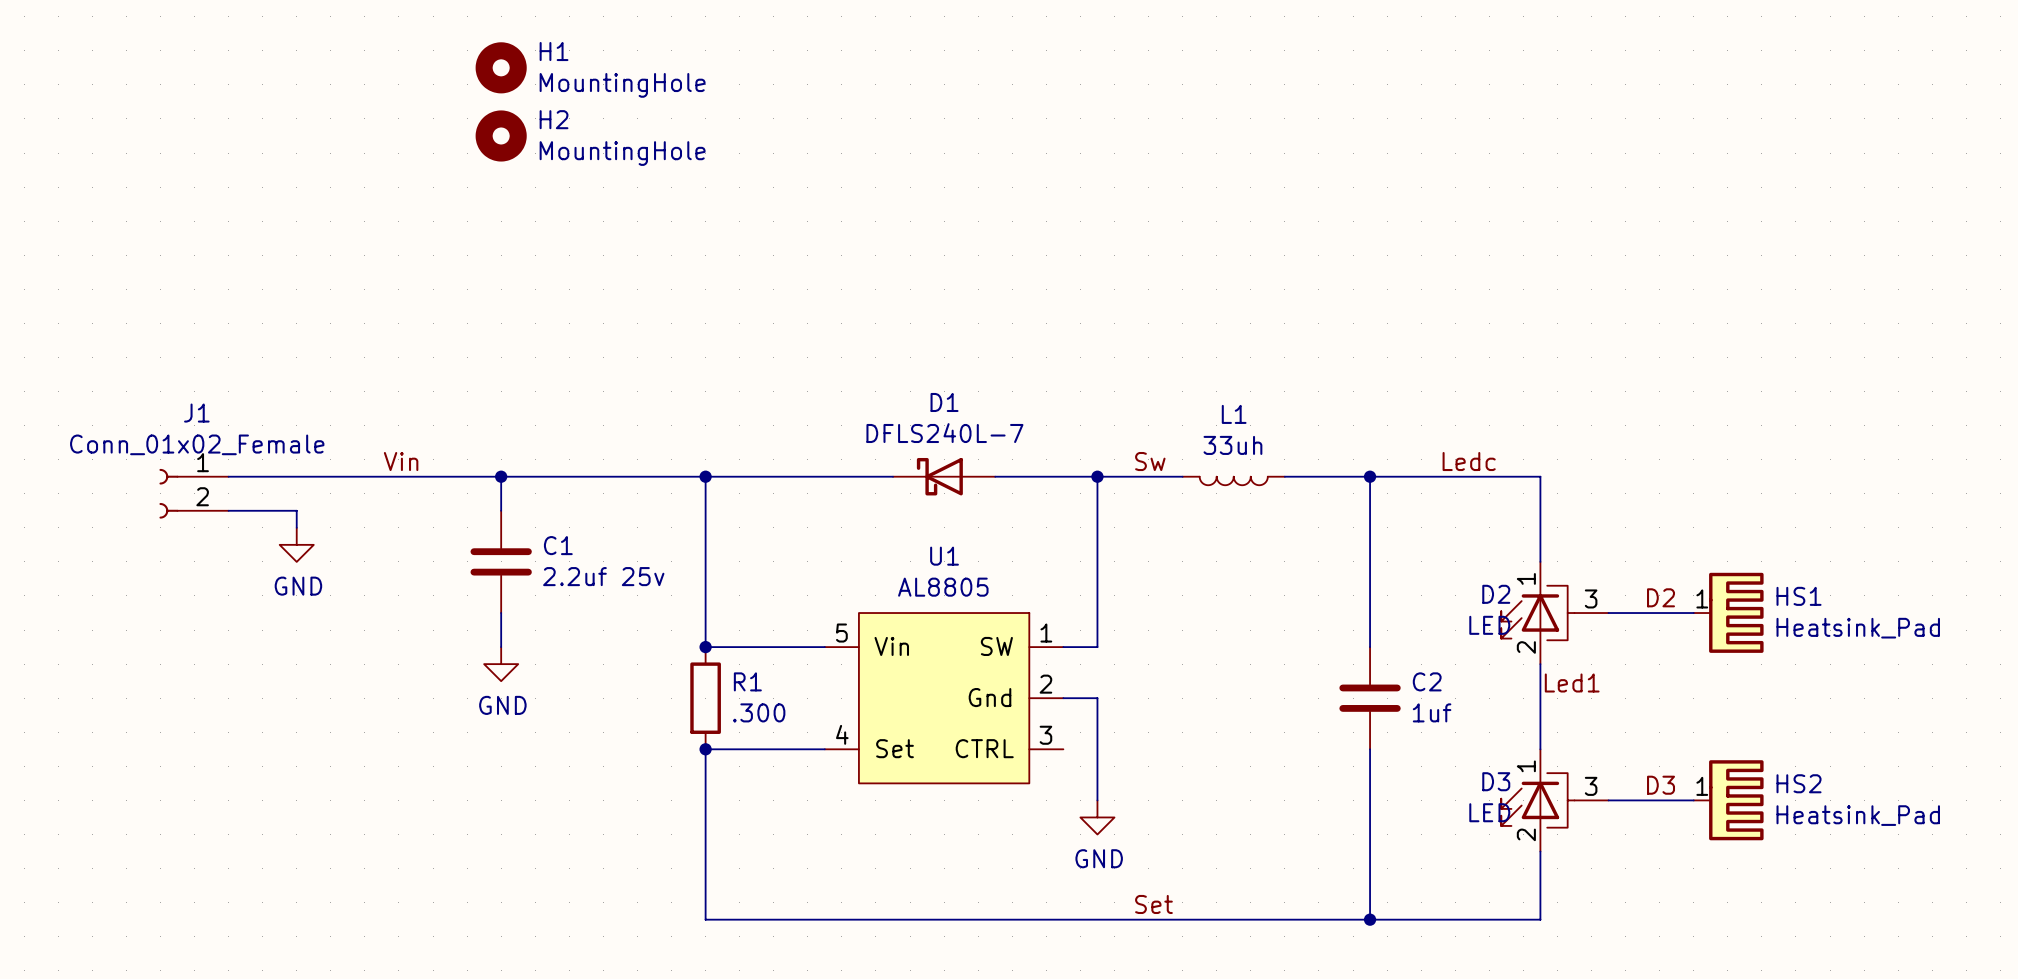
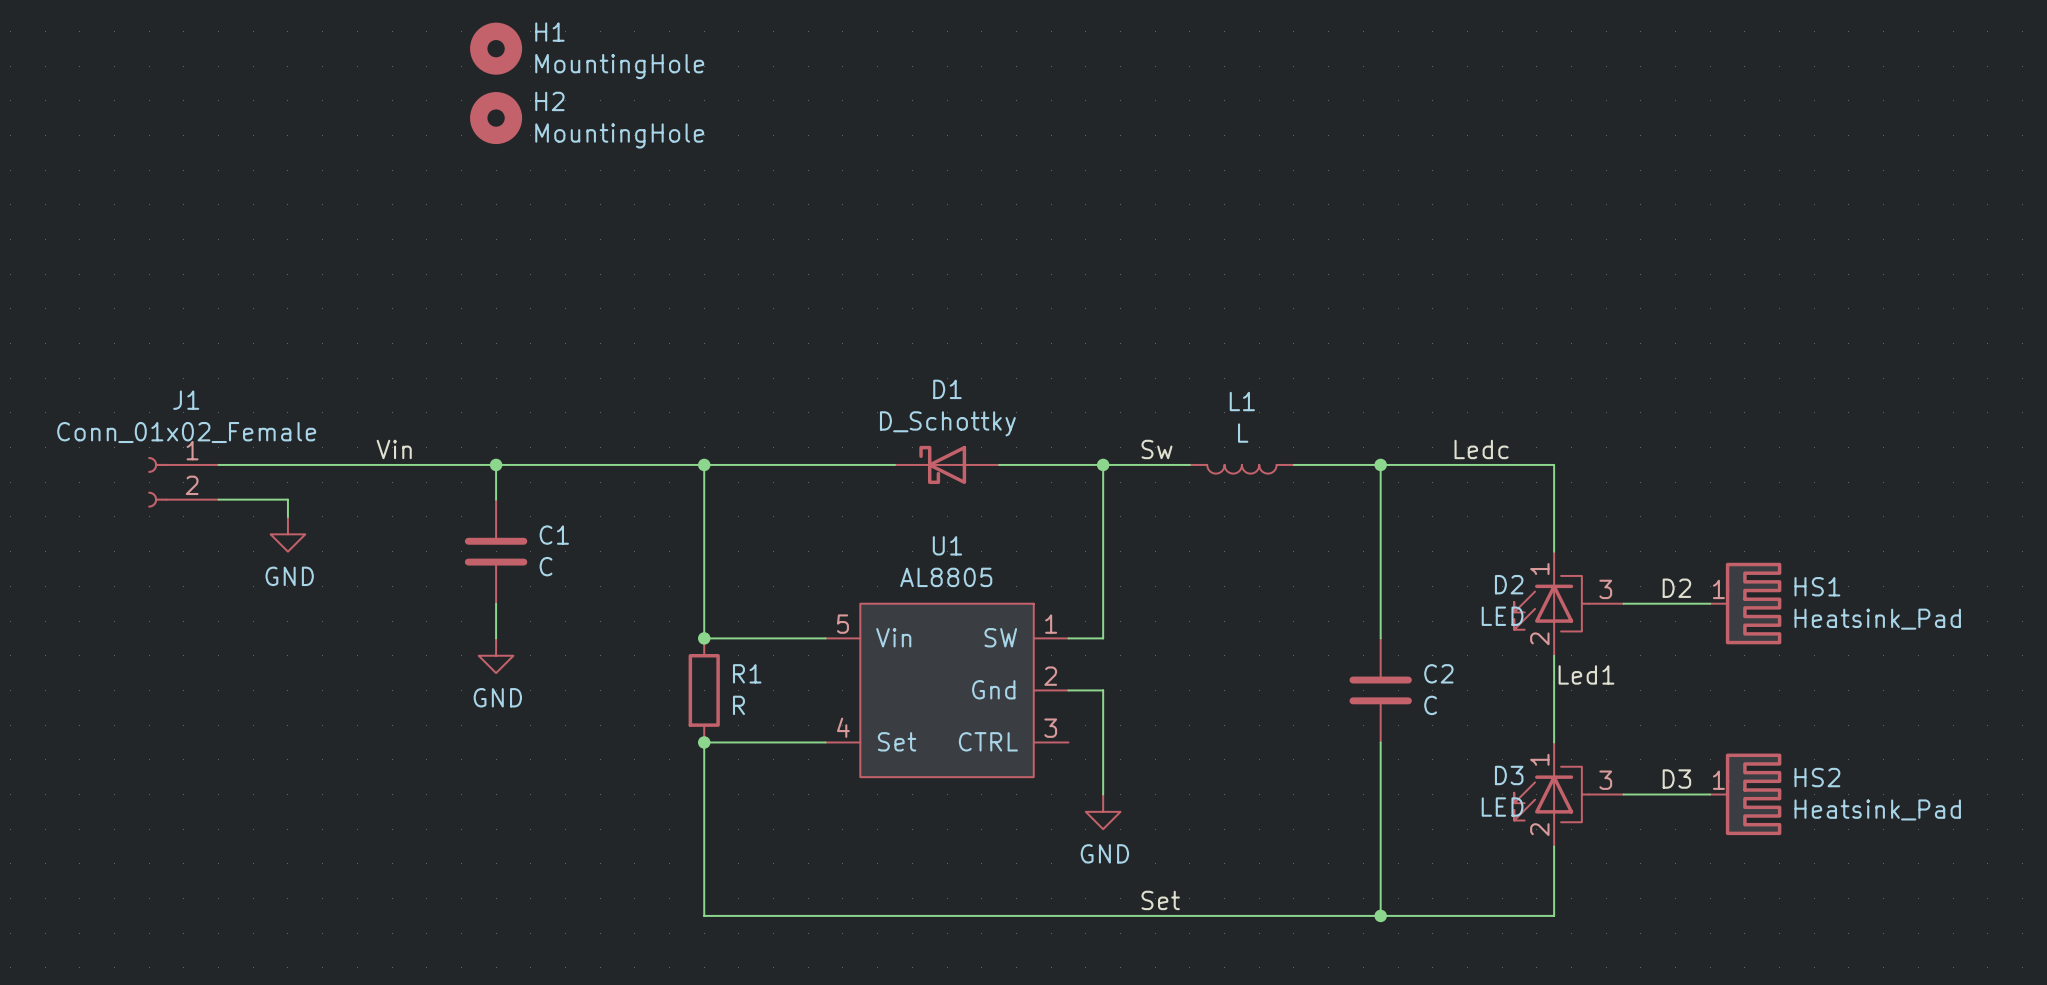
D1 value: DFLS240L-7 (944, 433) -> D_Schottky (947, 423)
L1 value: 33uh (1232, 445) -> L (1243, 433)
C1 value: 2.2uf 25v (603, 576) -> C (546, 566)
R1 value: .300 (759, 712) -> R (738, 705)
C2 value: 1uf (1432, 712) -> C (1430, 705)

